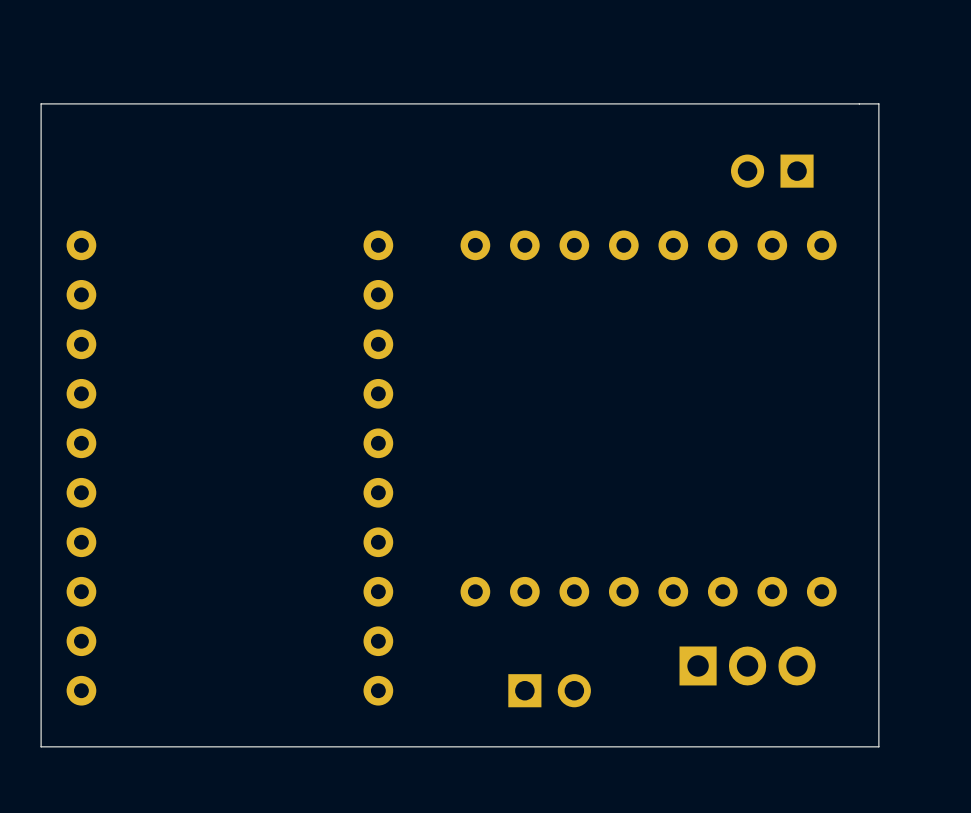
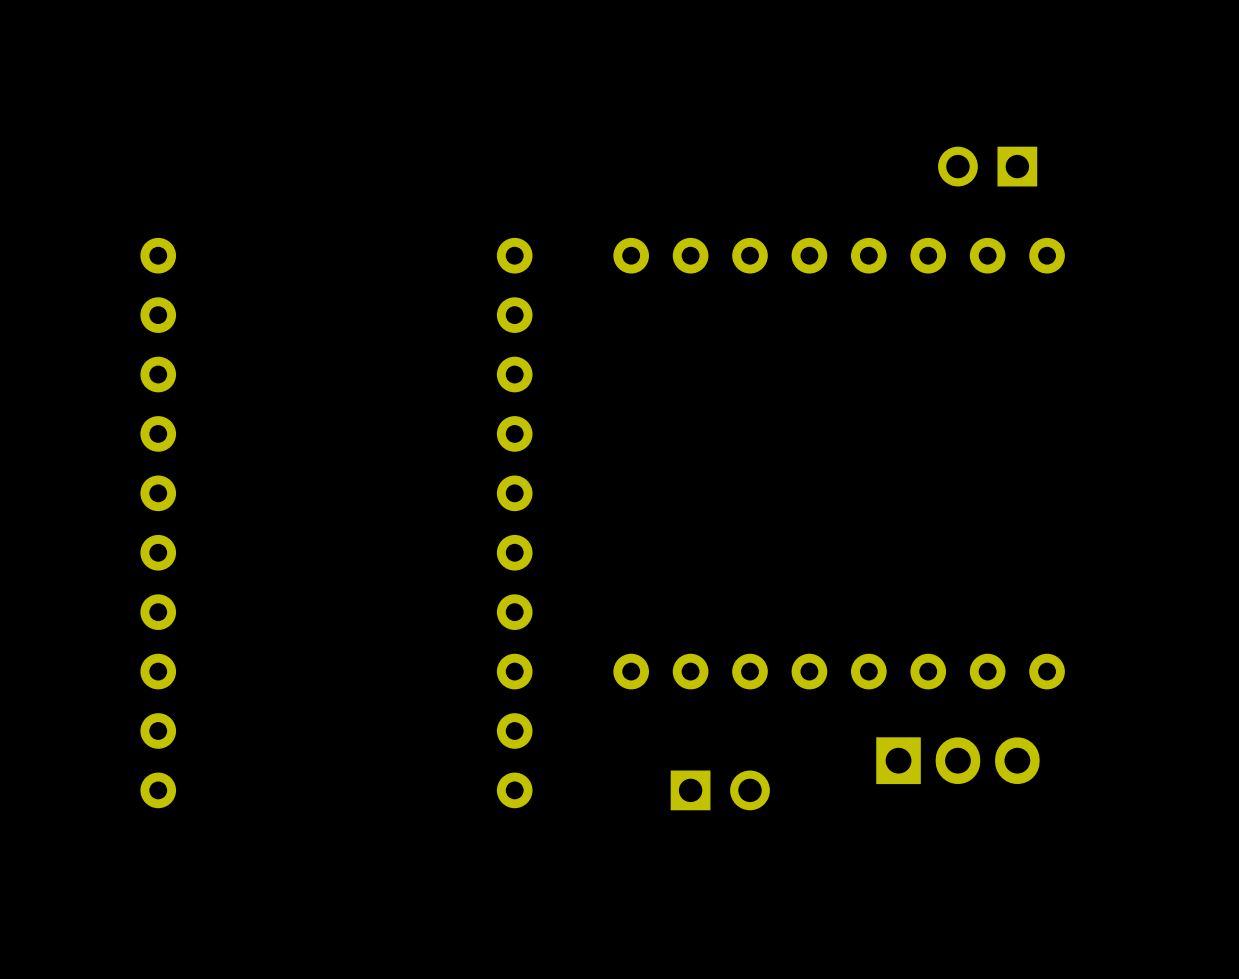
board edge: (878, 103) (41, 103) (41, 746) (878, 746) (878, 103) -> none

